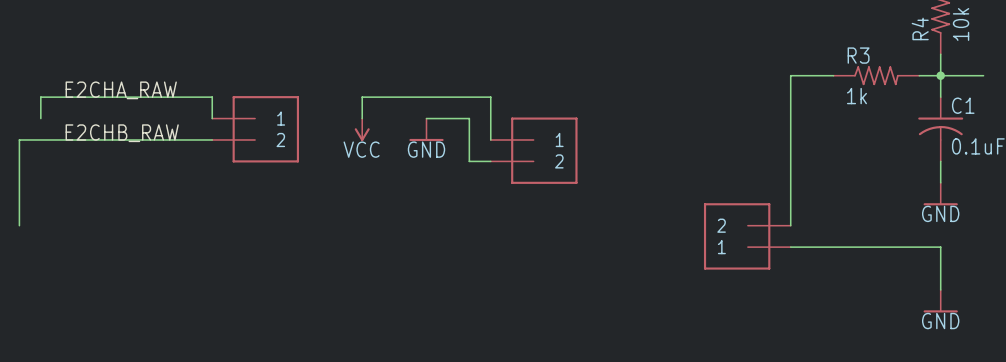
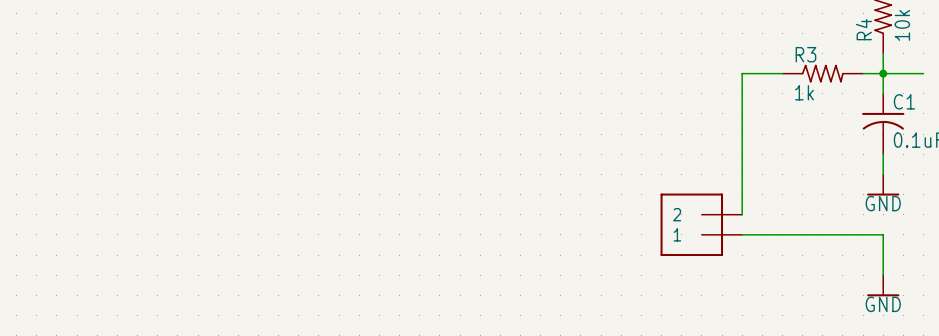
label: E2CHA_RAW (121, 90) -> none
wire: (40, 118) (40, 97) (212, 97) (212, 118) -> none
wire: (362, 118) (362, 97) (490, 97) (490, 139) -> none
wire: (426, 118) (469, 118) (469, 161) (490, 161) -> none
part: (255, 129) -> none
power symbol: VCC (362, 129) -> none
power symbol: GND (426, 129) -> none
label: E2CHB_RAW (122, 133) -> none
wire: (212, 139) (19, 139) (19, 225) -> none
part: (534, 150) -> none

